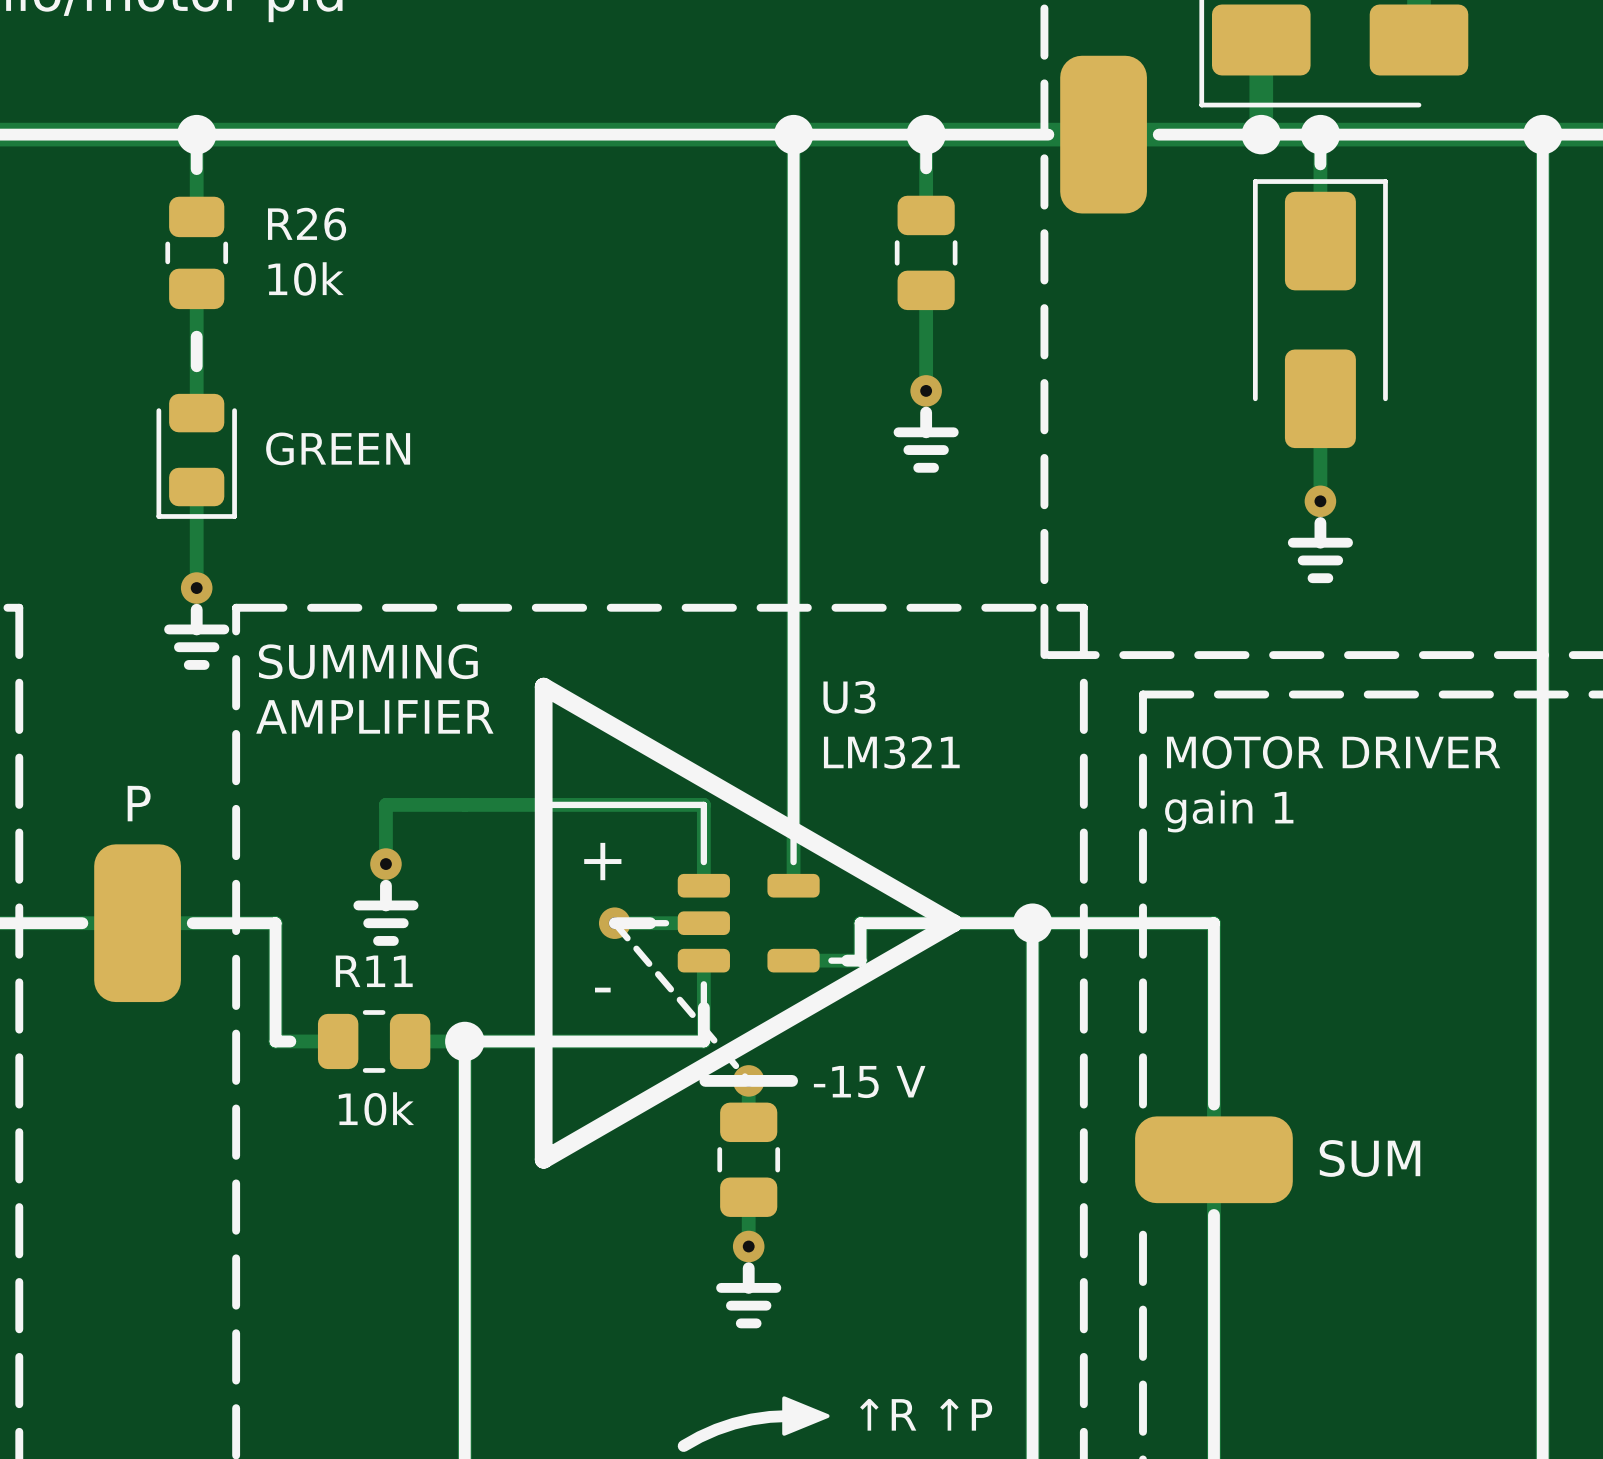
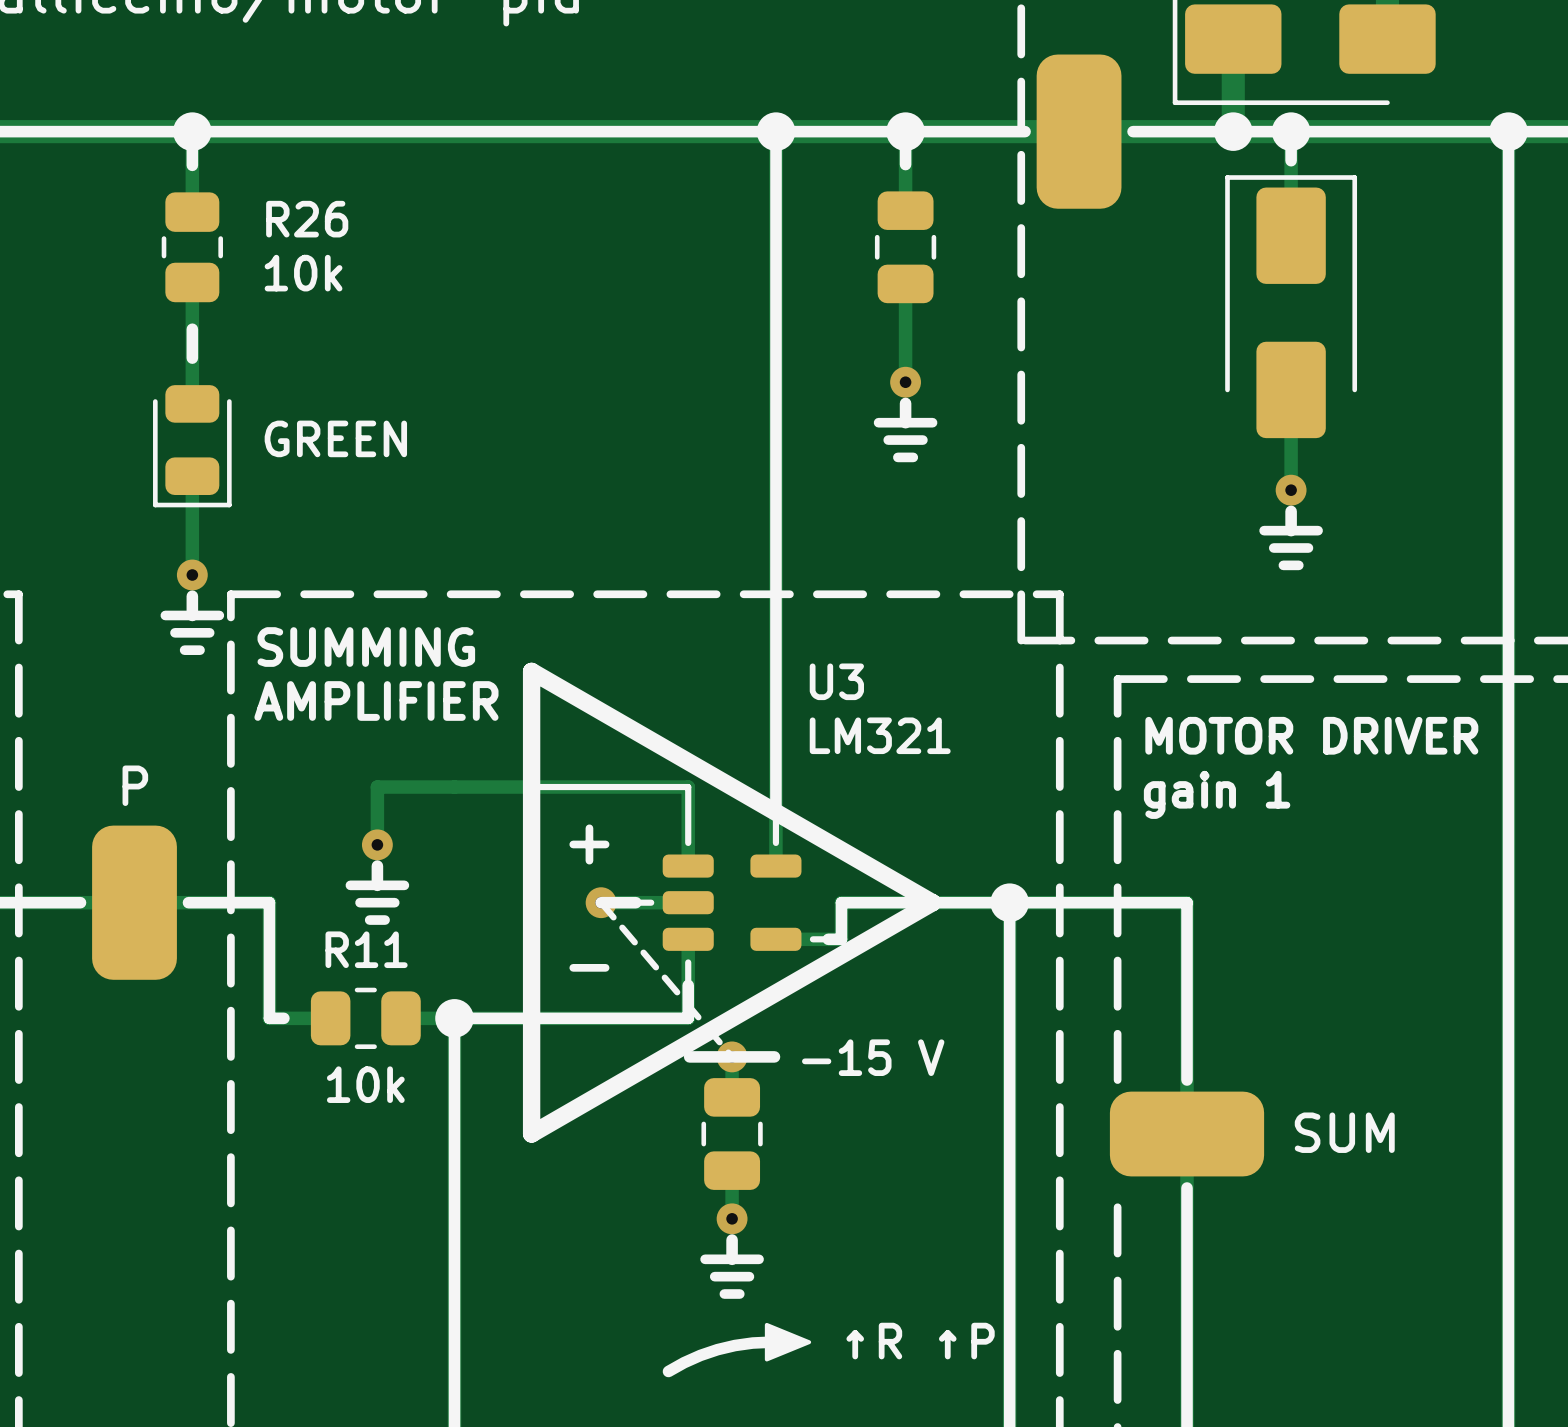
text position: ↑R ↑P (926, 1414) -> ↑R ↑P (920, 1341)
line: (788, 1416) (769, 1416) (733, 1423) (699, 1437) (683, 1446) -> (770, 1342) (752, 1343) (717, 1349) (700, 1355) (668, 1371)
drawing position: (805, 1416) -> (787, 1342)

